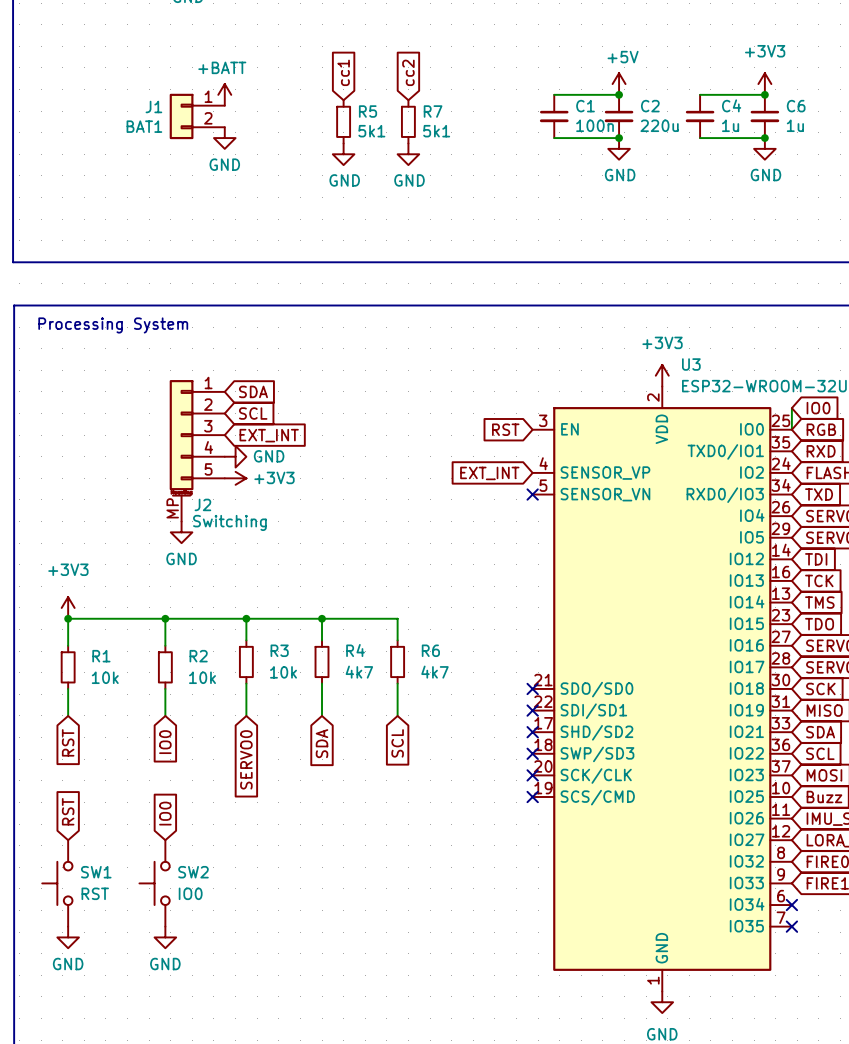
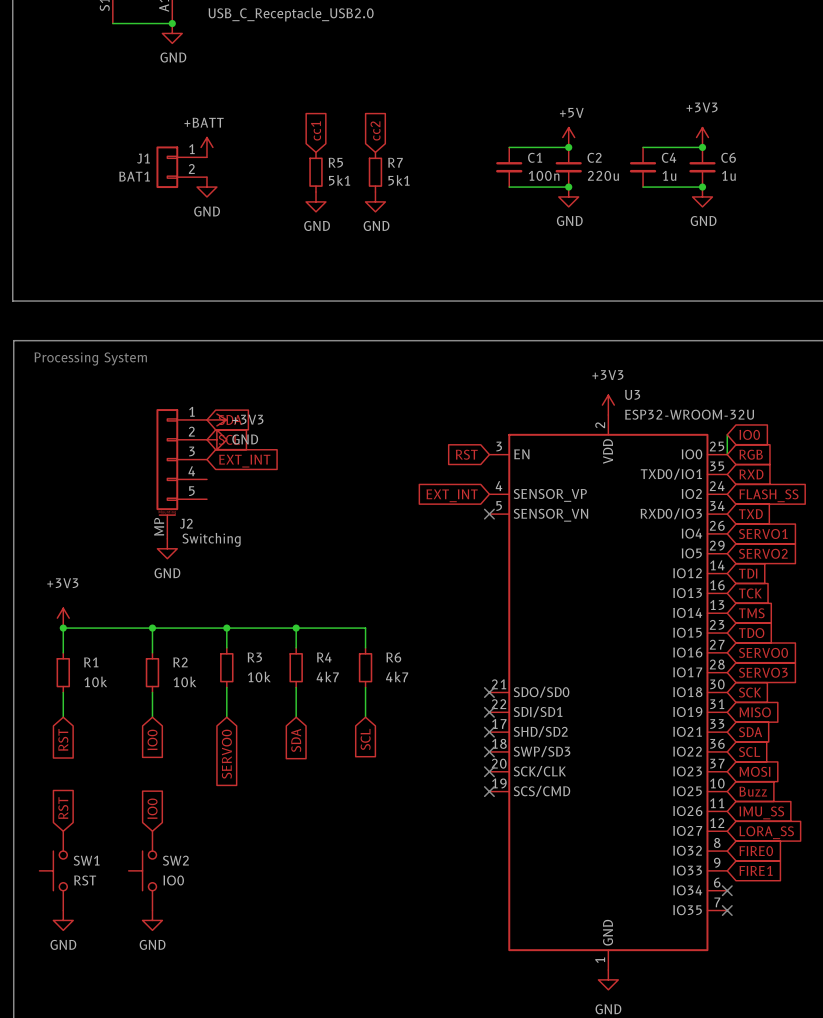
power symbol position: GND (235, 456) -> GND (216, 439)
power symbol position: +3V3 (235, 478) -> +3V3 (216, 419)

